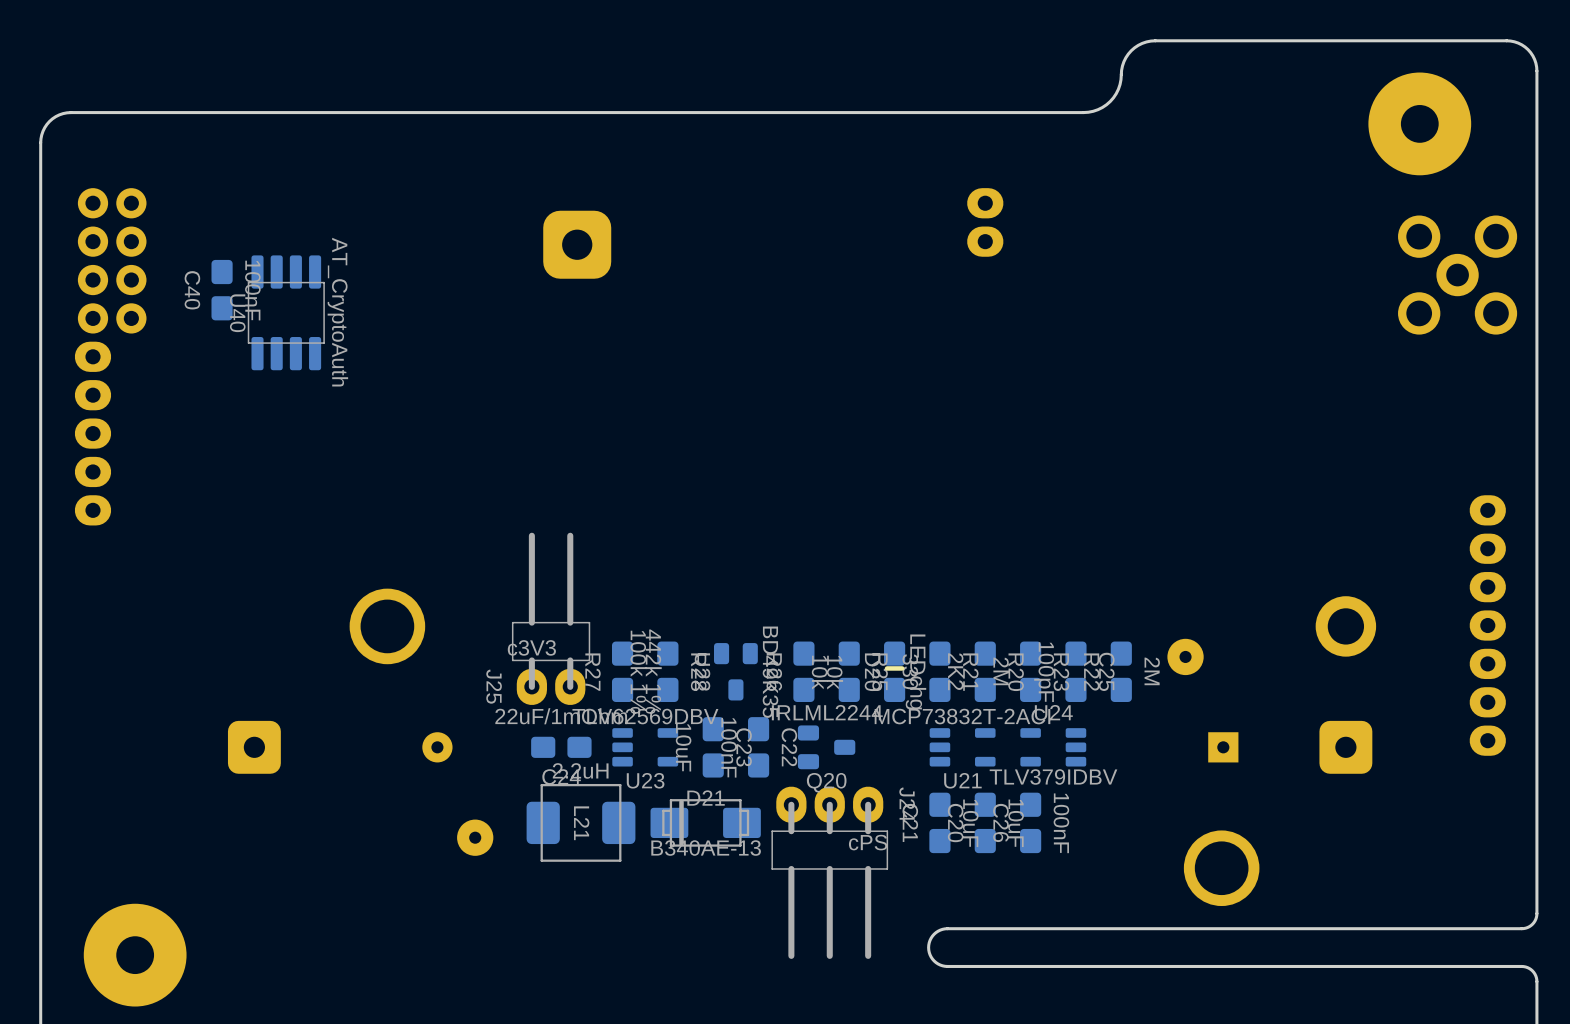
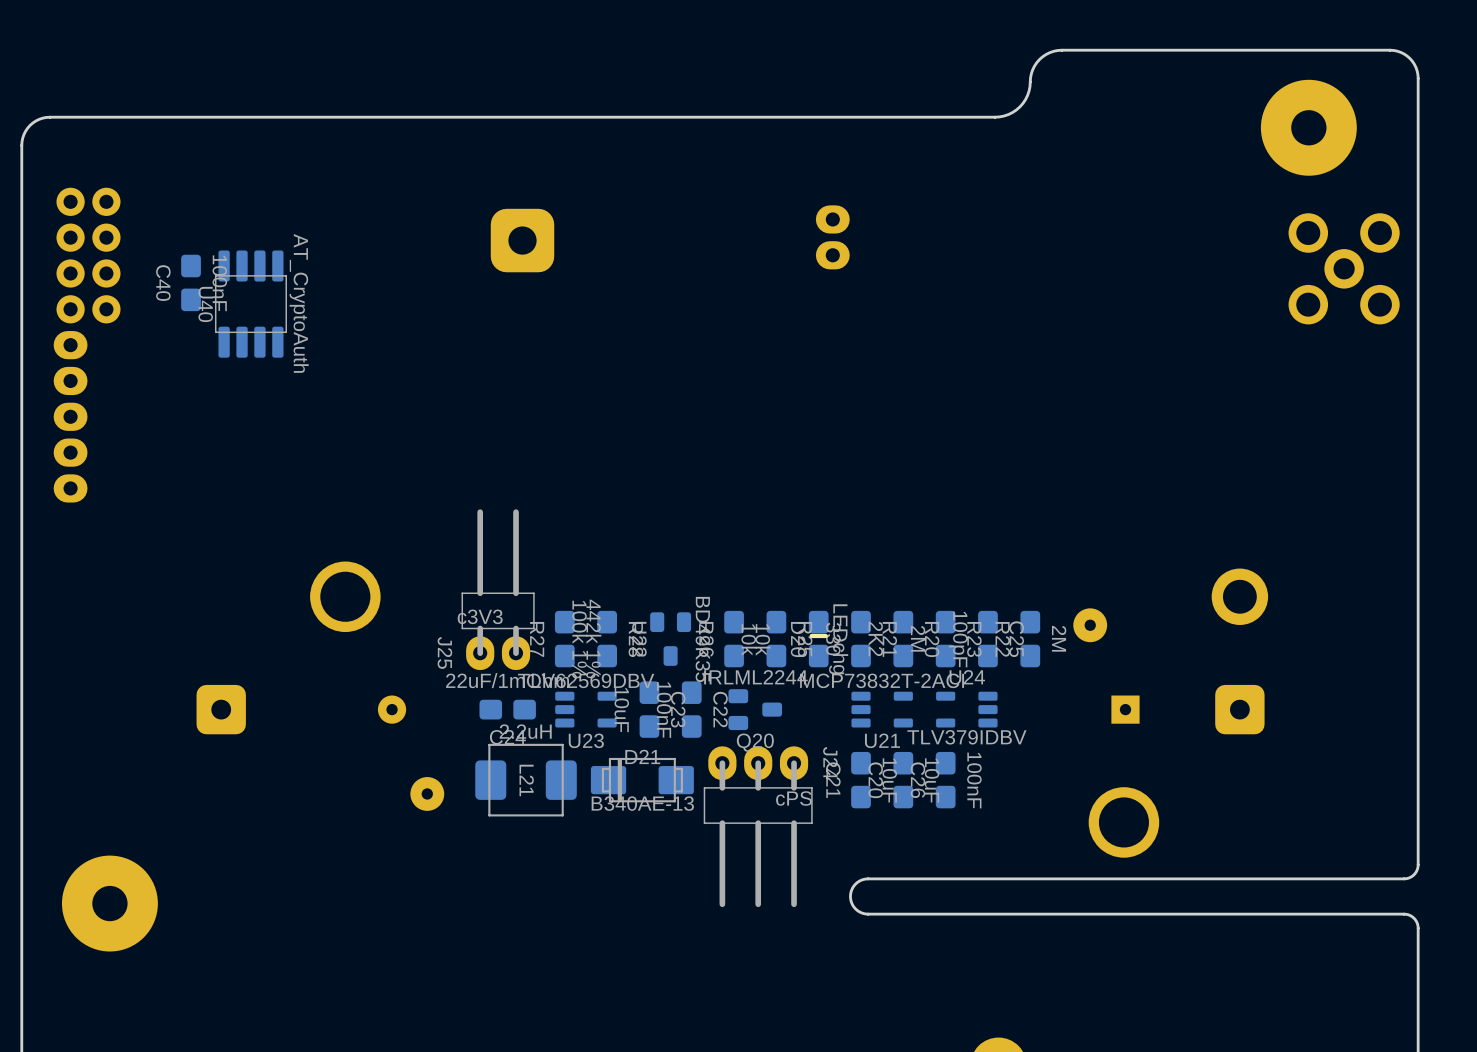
part position: (985, 222) -> (832, 237)
part: (1487, 567) -> none
part: (1487, 702) -> none

